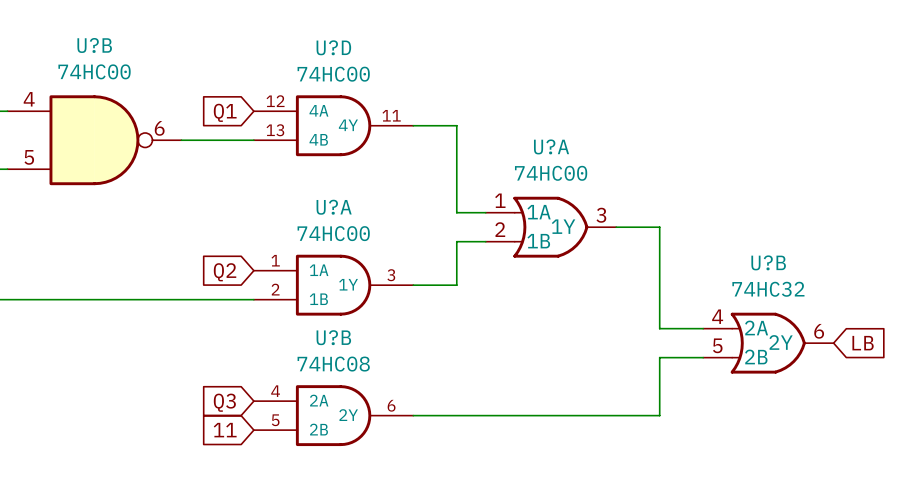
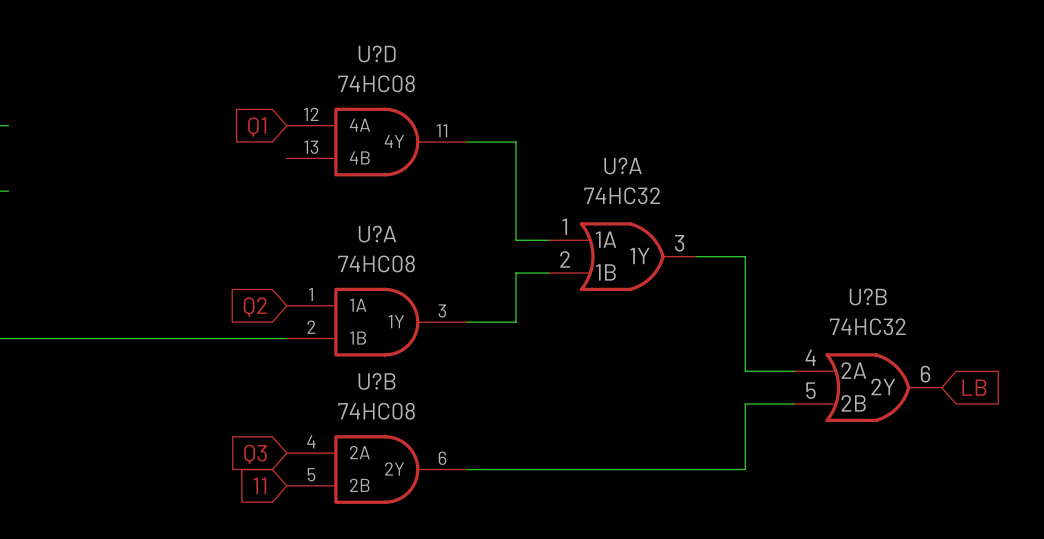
U?D value: 74HC00 (333, 74) -> 74HC08 (376, 83)
U?B: 74HC00 (94, 140) -> none
wire: (181, 140) (253, 140) -> none
U?A value: 74HC00 (551, 173) -> 74HC32 (622, 195)
U?A value: 74HC00 (333, 233) -> 74HC08 (376, 263)

